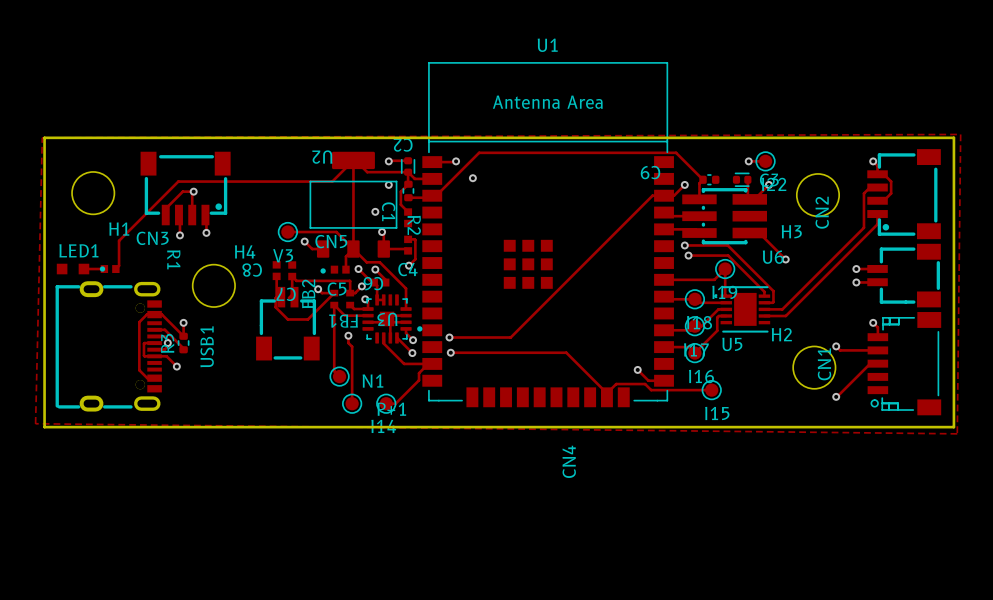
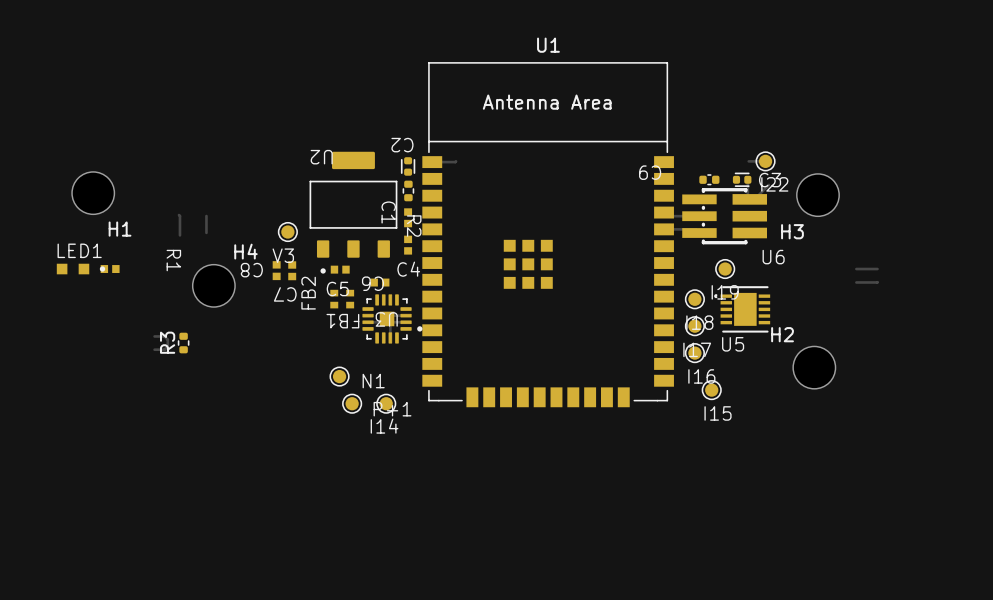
zone outline: (960, 134) (42, 137) (35, 423) (957, 433) (960, 134) -> none
board edge: (44, 137) (953, 137) (953, 427) (44, 427) (44, 137) -> none
track: (353, 160) (332, 181) (178, 181) (119, 240) (119, 265) (115, 269) -> none
track: (353, 160) (353, 249) (345, 256) (345, 269) -> none
track: (353, 160) (367, 172) (408, 172) -> none
track: (408, 160) (388, 161) -> none
via: (388, 161) -> none
via: (456, 161) -> none
via: (748, 161) -> none
track: (873, 161) (877, 165) (877, 174) (883, 174) (891, 181) (891, 193) (883, 200) (877, 200) -> none
via: (873, 161) -> none
track: (408, 172) (414, 178) (432, 178) -> none
track: (408, 172) (408, 184) (400, 191) (400, 204) (408, 212) -> none
via: (472, 178) -> none
via: (388, 184) -> none
track: (684, 184) (674, 195) (652, 195) (510, 337) (449, 337) -> none
via: (684, 184) -> none
via: (768, 184) -> none
track: (877, 187) (869, 187) (863, 193) (863, 227) (782, 309) (764, 309) -> none
CN3: (185, 188) -> none
via: (193, 191) -> none
CN2: (904, 194) -> none
track: (408, 197) (430, 197) (436, 195) (479, 152) (676, 152) (703, 179) (699, 183) (699, 199) -> none
via: (375, 211) -> none
track: (877, 214) (877, 224) (785, 316) (764, 316) -> none
track: (165, 215) (165, 208) (182, 191) (193, 191) (192, 215) -> none
via: (206, 232) -> none
track: (287, 232) (336, 232) (366, 262) (379, 262) (406, 288) (406, 309) -> none
track: (382, 232) (383, 233) (383, 249) (406, 249) (408, 250) -> none
via: (382, 232) -> none
track: (749, 233) (759, 233) (785, 259) -> none
via: (179, 235) -> none
track: (408, 239) (415, 240) (415, 259) (408, 265) -> none
track: (304, 241) (312, 249) (323, 249) -> none
via: (304, 241) -> none
track: (684, 245) (727, 245) (773, 291) (773, 302) (764, 302) -> none
via: (684, 245) -> none
track: (688, 255) (728, 255) (764, 291) (764, 296) -> none
via: (688, 255) -> none
via: (785, 259) -> none
via: (408, 265) -> none
track: (83, 269) (104, 269) -> none
track: (358, 269) (377, 285) (377, 299) (383, 299) -> none
via: (358, 269) -> none
track: (375, 269) (385, 279) (383, 284) -> none
via: (375, 269) -> none
via: (856, 269) -> none
CN4: (904, 275) -> none
track: (276, 276) (275, 307) (287, 319) (307, 319) (334, 293) (322, 293) (318, 289) -> none
track: (664, 279) (714, 279) (725, 269) (726, 296) -> none
via: (856, 282) -> none
track: (361, 286) (355, 293) (350, 293) (349, 280) (296, 280) (292, 276) (292, 294) (288, 298) -> none
via: (361, 286) -> none
via: (318, 289) -> none
track: (664, 296) (666, 299) (694, 299) (698, 302) (726, 302) -> none
track: (365, 299) (368, 302) (368, 309) (354, 309) (350, 305) -> none
via: (365, 299) -> none
track: (726, 309) (718, 309) (701, 326) (694, 326) (690, 330) (664, 330) -> none
track: (368, 315) (344, 315) (334, 305) (334, 371) (339, 376) -> none
track: (726, 316) (717, 317) (717, 330) (694, 353) (688, 347) (664, 347) -> none
track: (183, 322) (183, 336) (161, 314) (146, 314) (139, 322) (139, 370) (147, 378) (154, 378) -> none
via: (183, 322) -> none
track: (873, 322) (877, 327) (877, 337) -> none
via: (873, 322) -> none
CN5: (287, 323) -> none
track: (406, 328) (406, 333) (413, 340) -> none
track: (154, 329) (164, 329) (183, 349) -> none
track: (348, 335) (348, 343) (352, 346) (352, 403) -> none
via: (348, 335) -> none
track: (383, 337) (383, 343) (404, 363) (432, 363) -> none
track: (396, 337) (412, 353) -> none
via: (449, 337) -> none
via: (413, 340) -> none
track: (154, 343) (143, 343) (143, 355) (166, 356) (176, 366) -> none
via: (167, 343) -> none
USB1: (108, 346) -> none
track: (836, 346) (840, 350) (877, 350) -> none
via: (836, 346) -> none
track: (450, 352) (566, 352) (606, 393) -> none
via: (450, 352) -> none
via: (412, 353) -> none
track: (428, 363) (419, 373) (419, 380) (395, 403) (386, 403) -> none
track: (877, 363) (870, 363) (836, 396) -> none
CN1: (904, 363) -> none
via: (176, 366) -> none
track: (637, 369) (648, 380) (664, 380) -> none
via: (637, 369) -> none
track: (711, 390) (651, 390) (645, 384) (616, 384) (606, 393) -> none
via: (836, 396) -> none

